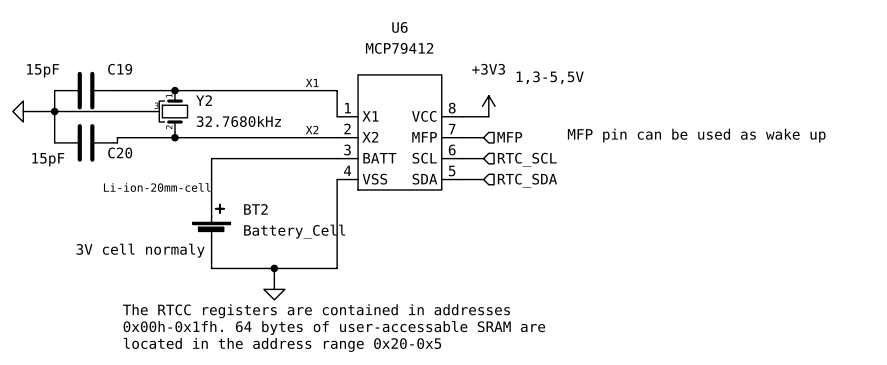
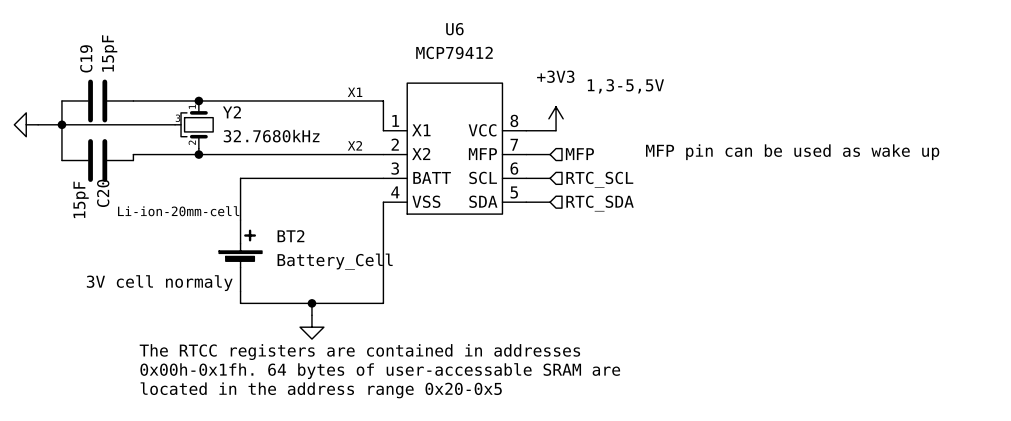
C19 name rotation: 0° (120, 69) -> 90° counterclockwise (86, 58)
C19 name position: C19 (120, 69) -> C19 (86, 58)
C19 value rotation: 0° (43, 70) -> 90° counterclockwise (109, 53)
C19 value position: 15pF (43, 70) -> 15pF (109, 53)
C20 name rotation: 0° (120, 152) -> 90° counterclockwise (103, 193)
C20 value rotation: 0° (48, 159) -> 90° counterclockwise (81, 199)

